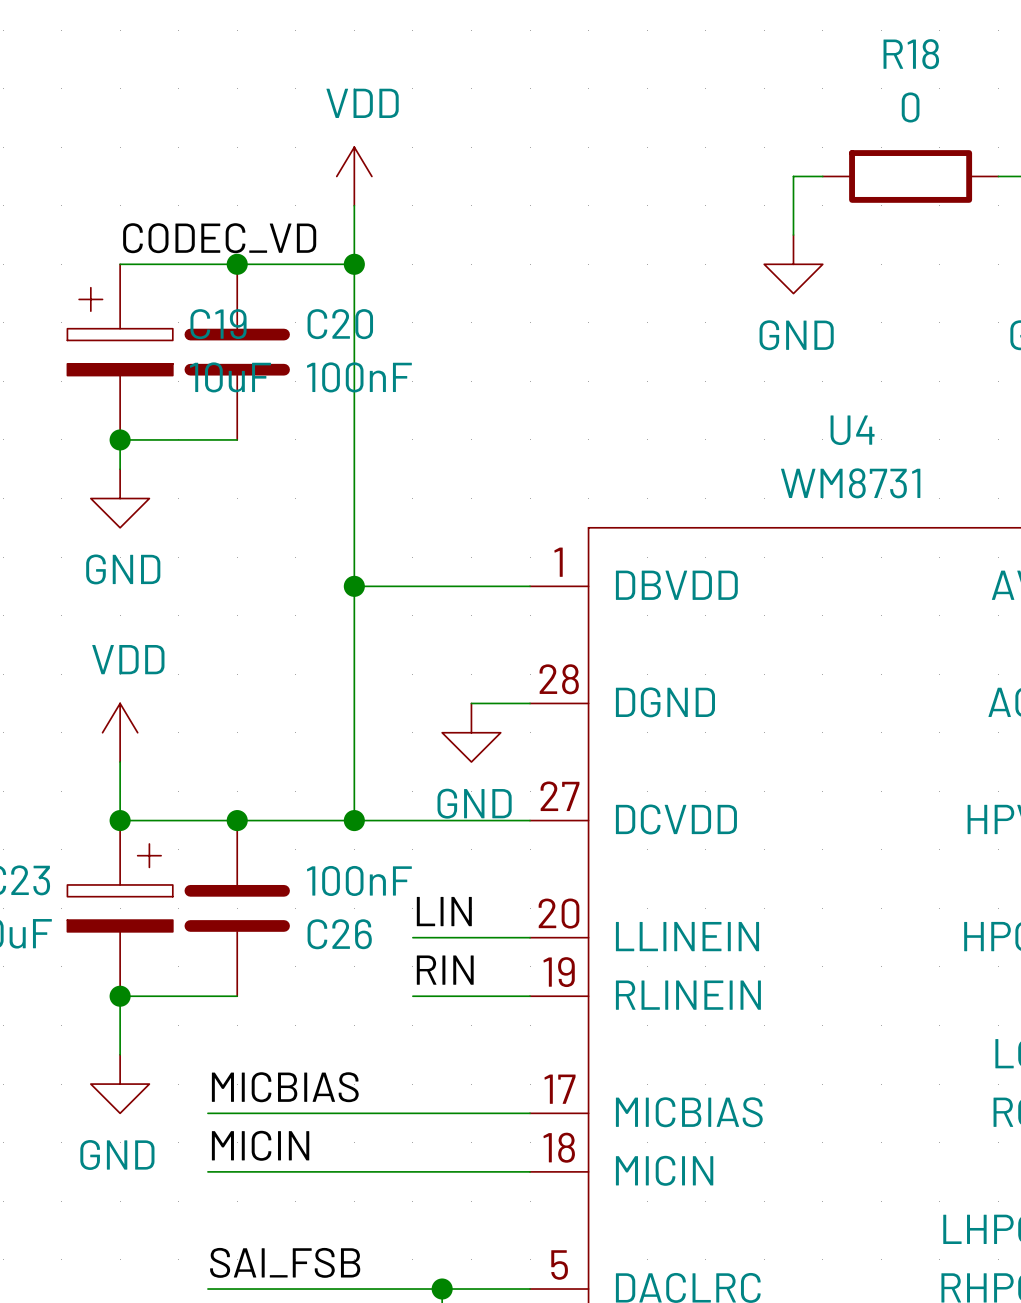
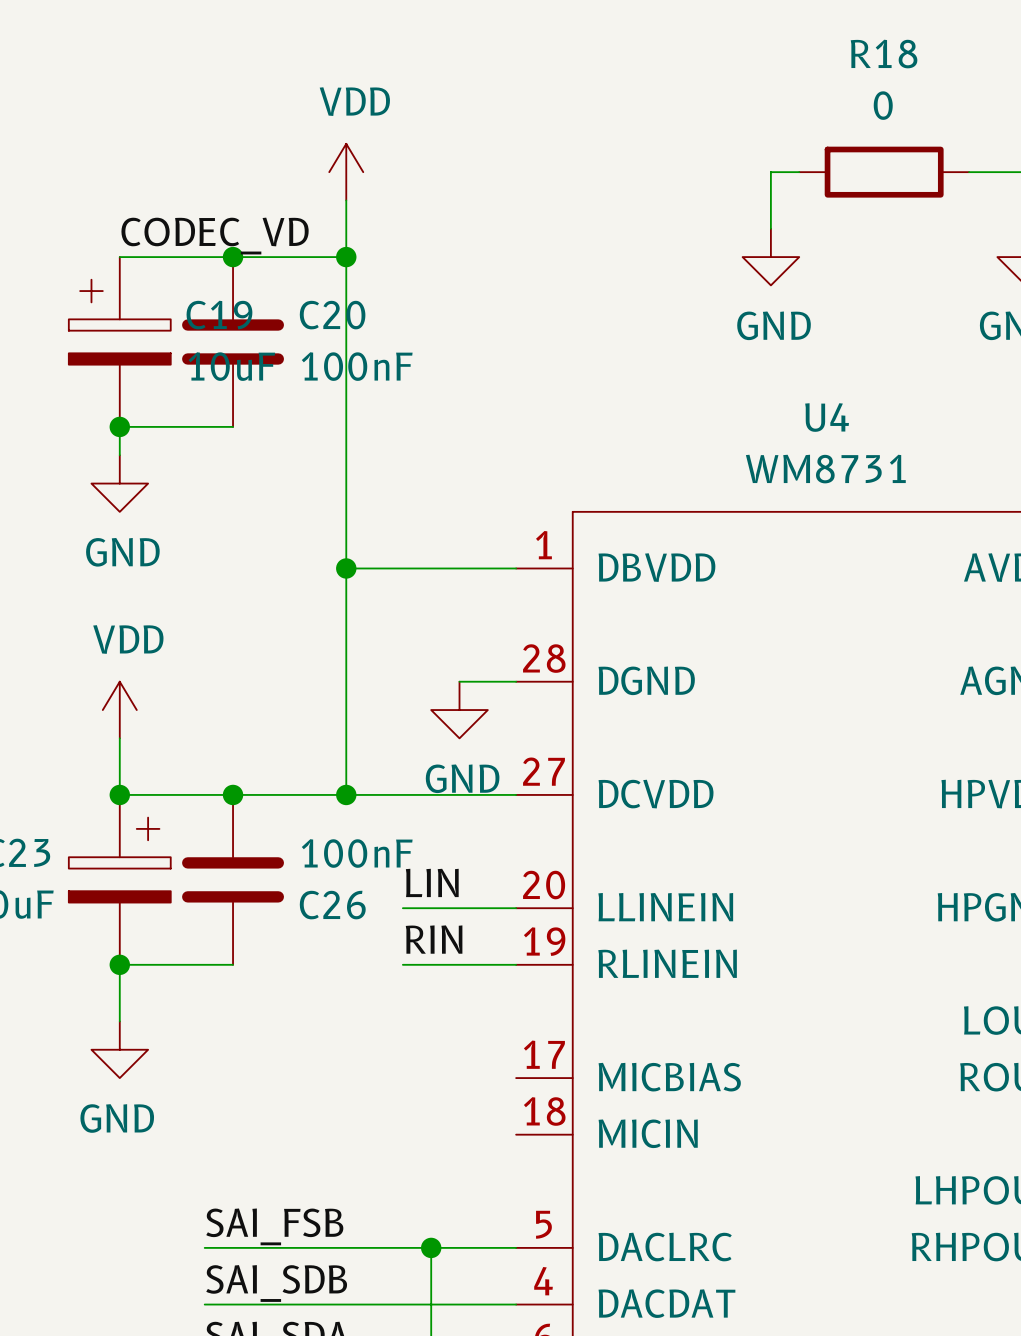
label: MICBIAS (285, 1087) -> none
wire: (207, 1113) (530, 1113) -> none
label: MICIN (260, 1145) -> none
wire: (207, 1171) (530, 1171) -> none

